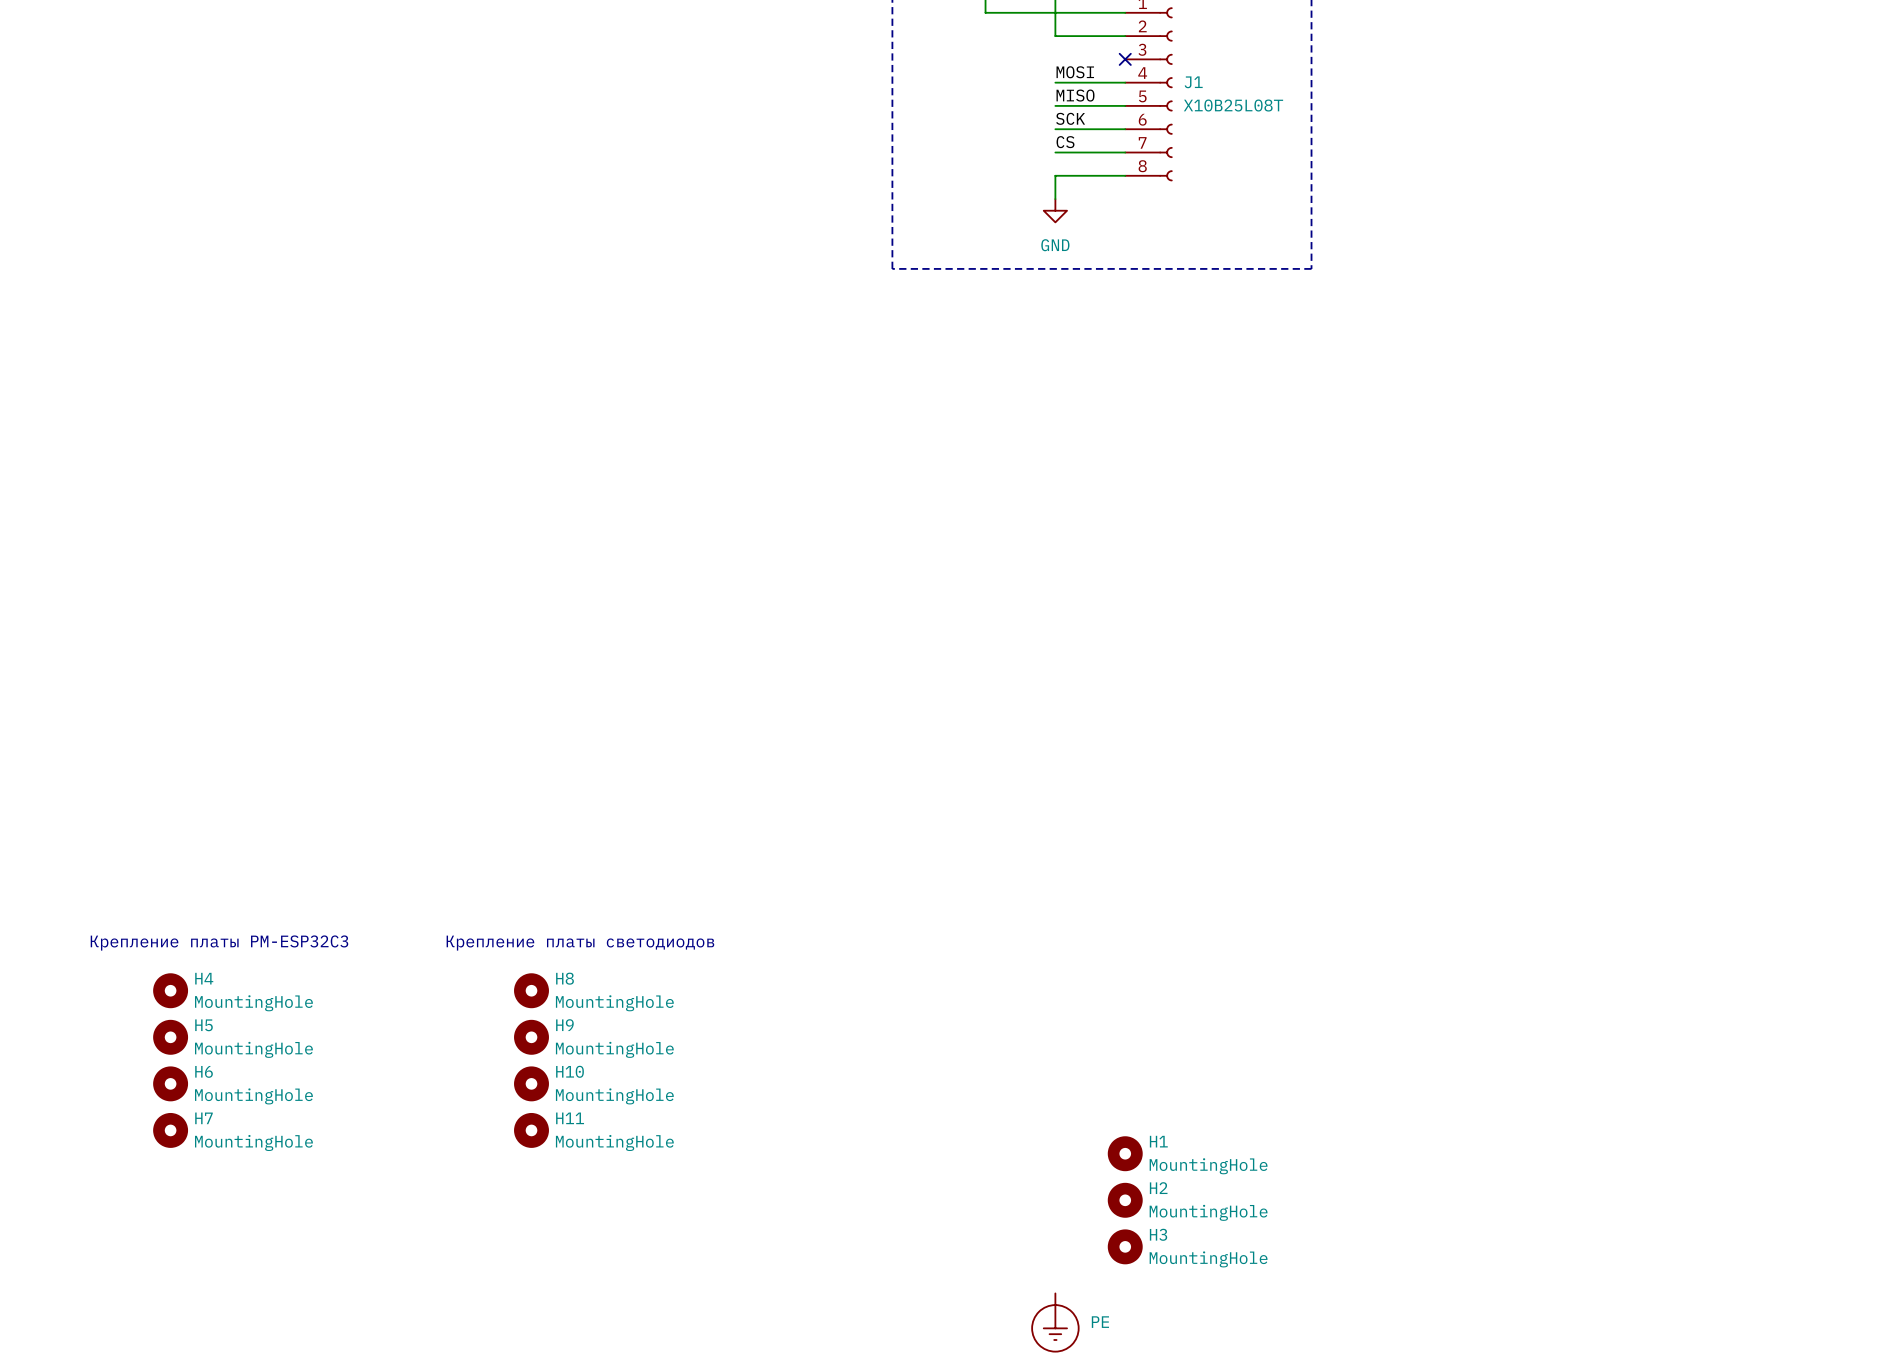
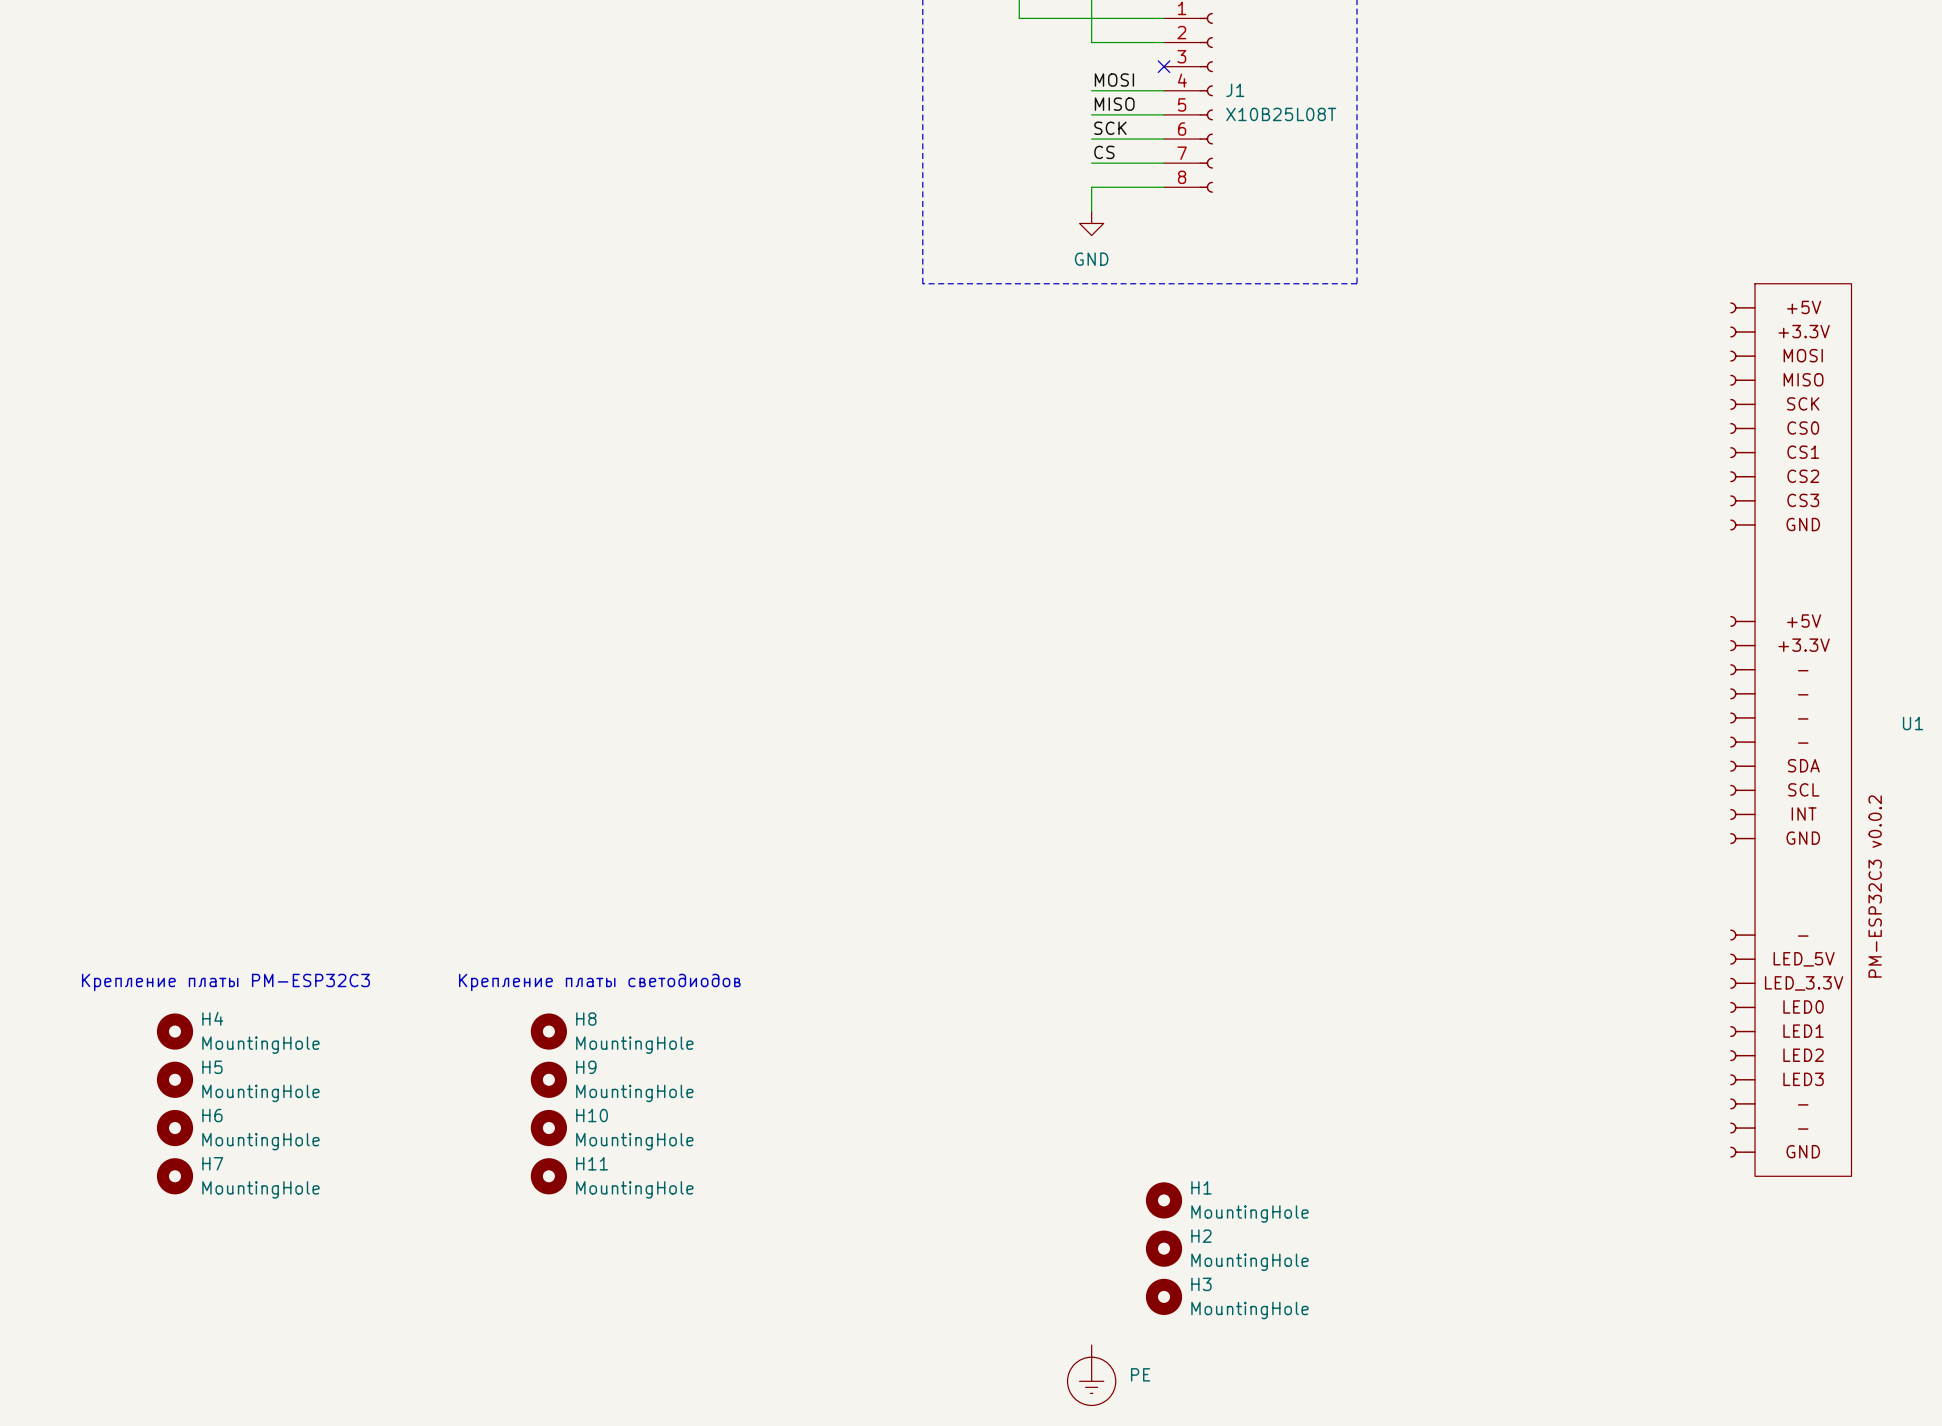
U1: none -> (1790, 730)

